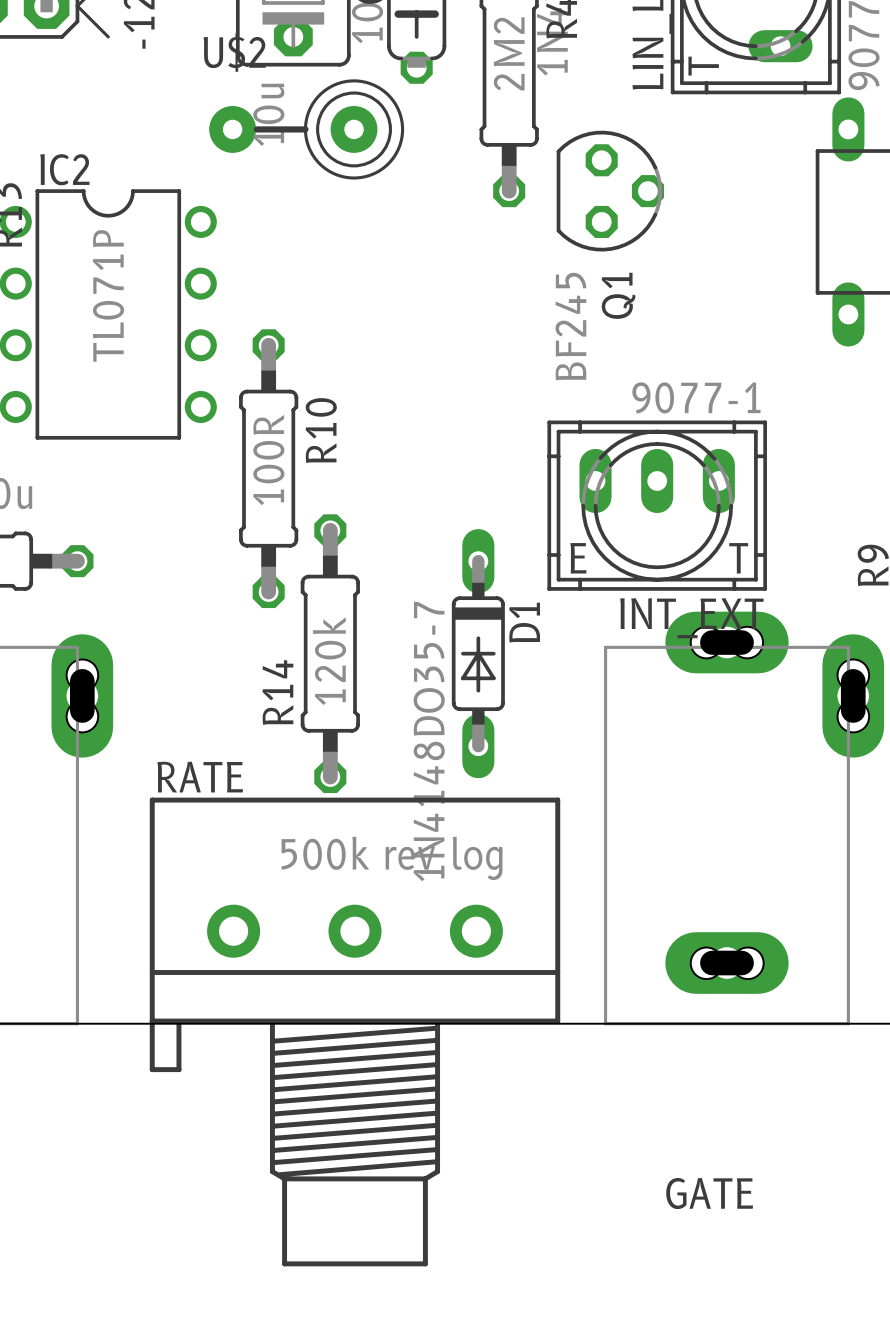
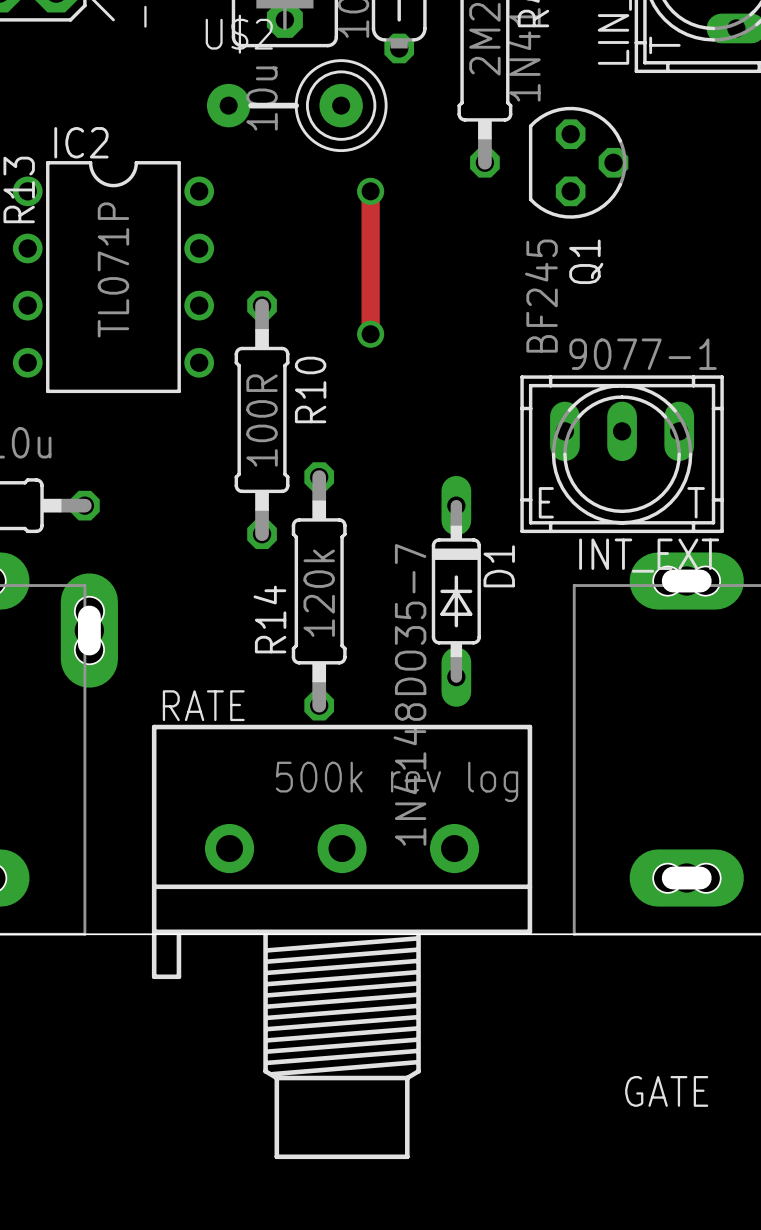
track: none -> (370, 191) (370, 334)
via: none -> (370, 191)
via: none -> (370, 334)

